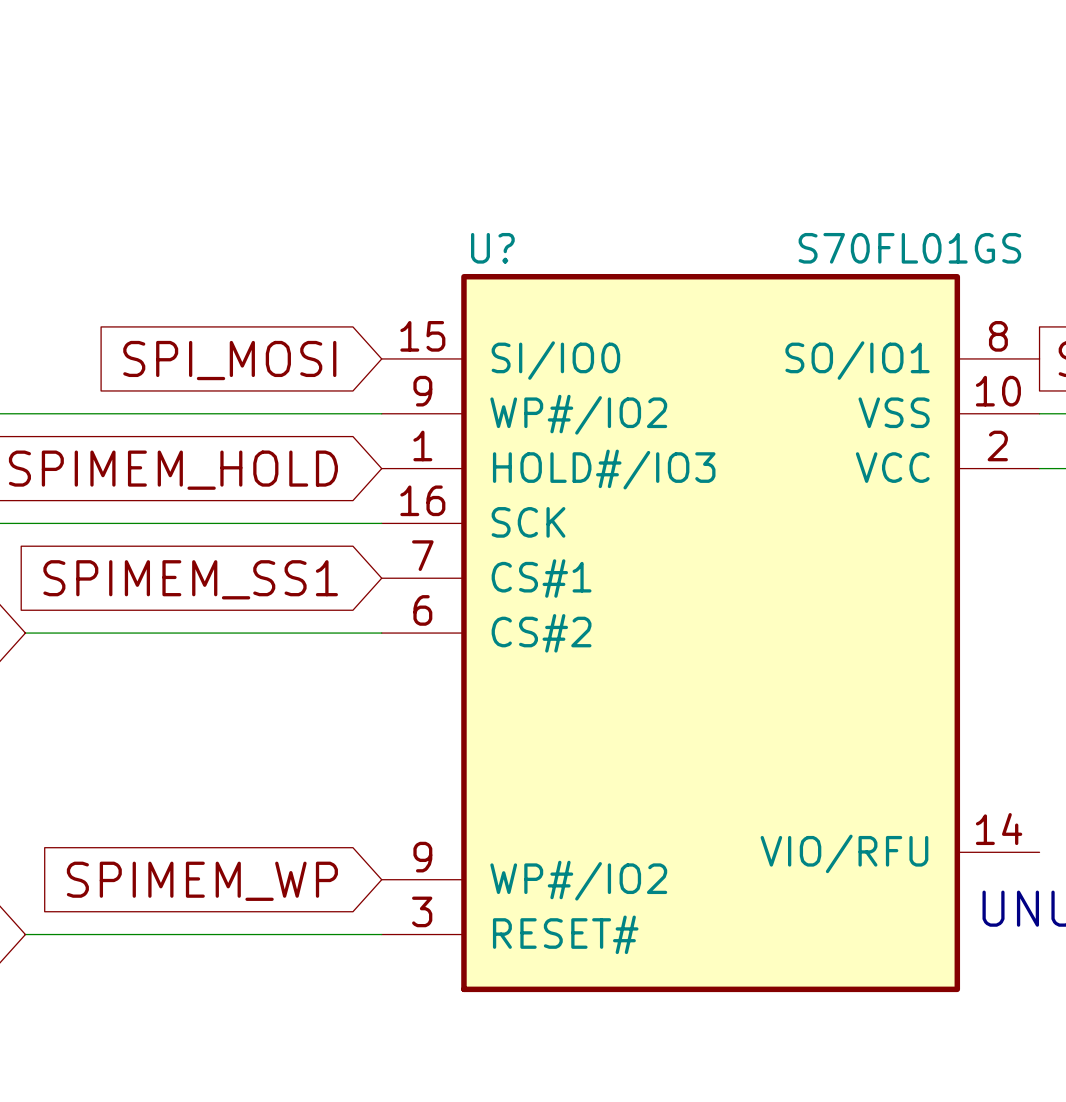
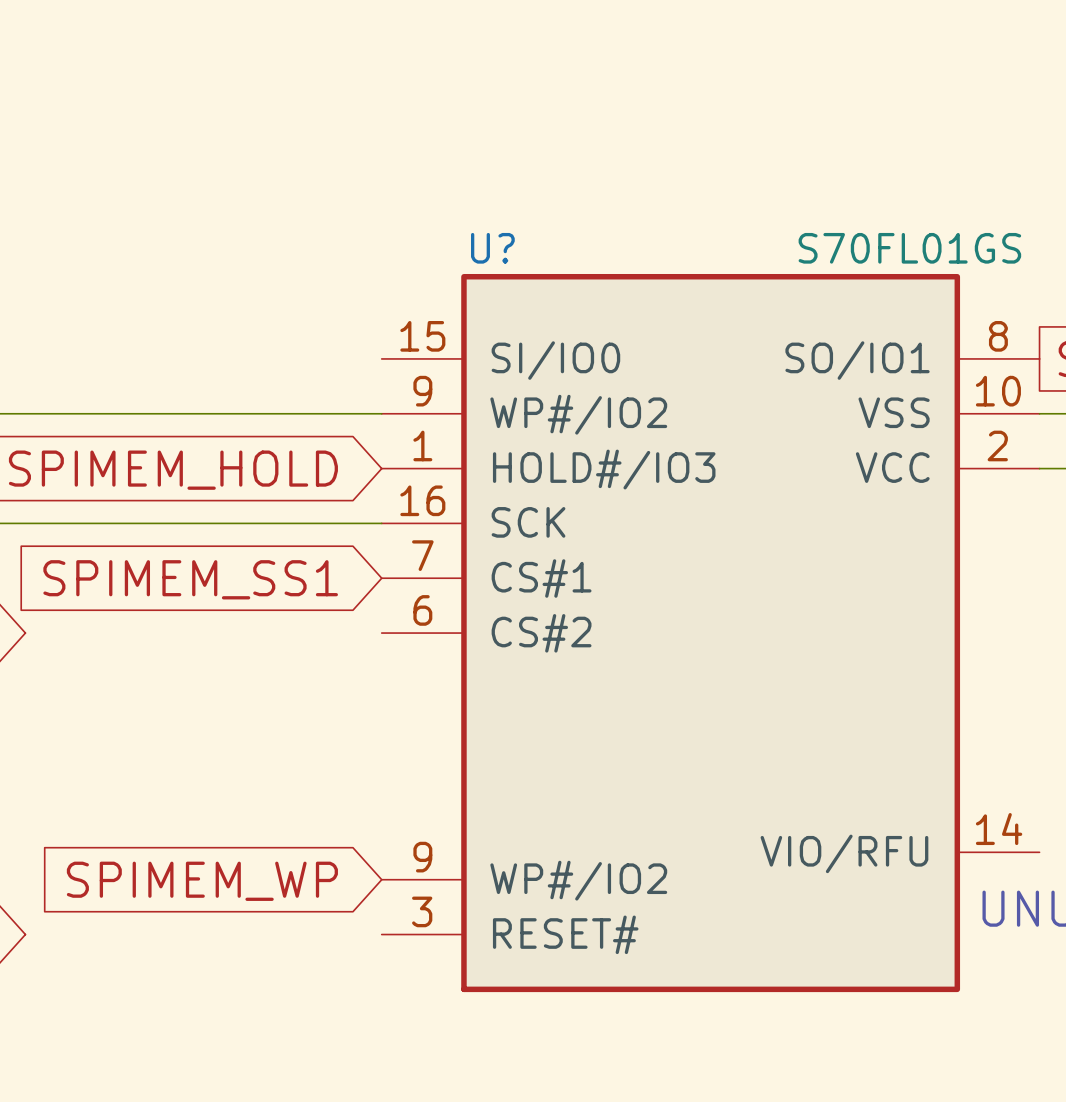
global label: SPI_MOSI (229, 360) -> none
wire: (25, 633) (381, 633) -> none
wire: (25, 934) (381, 934) -> none

